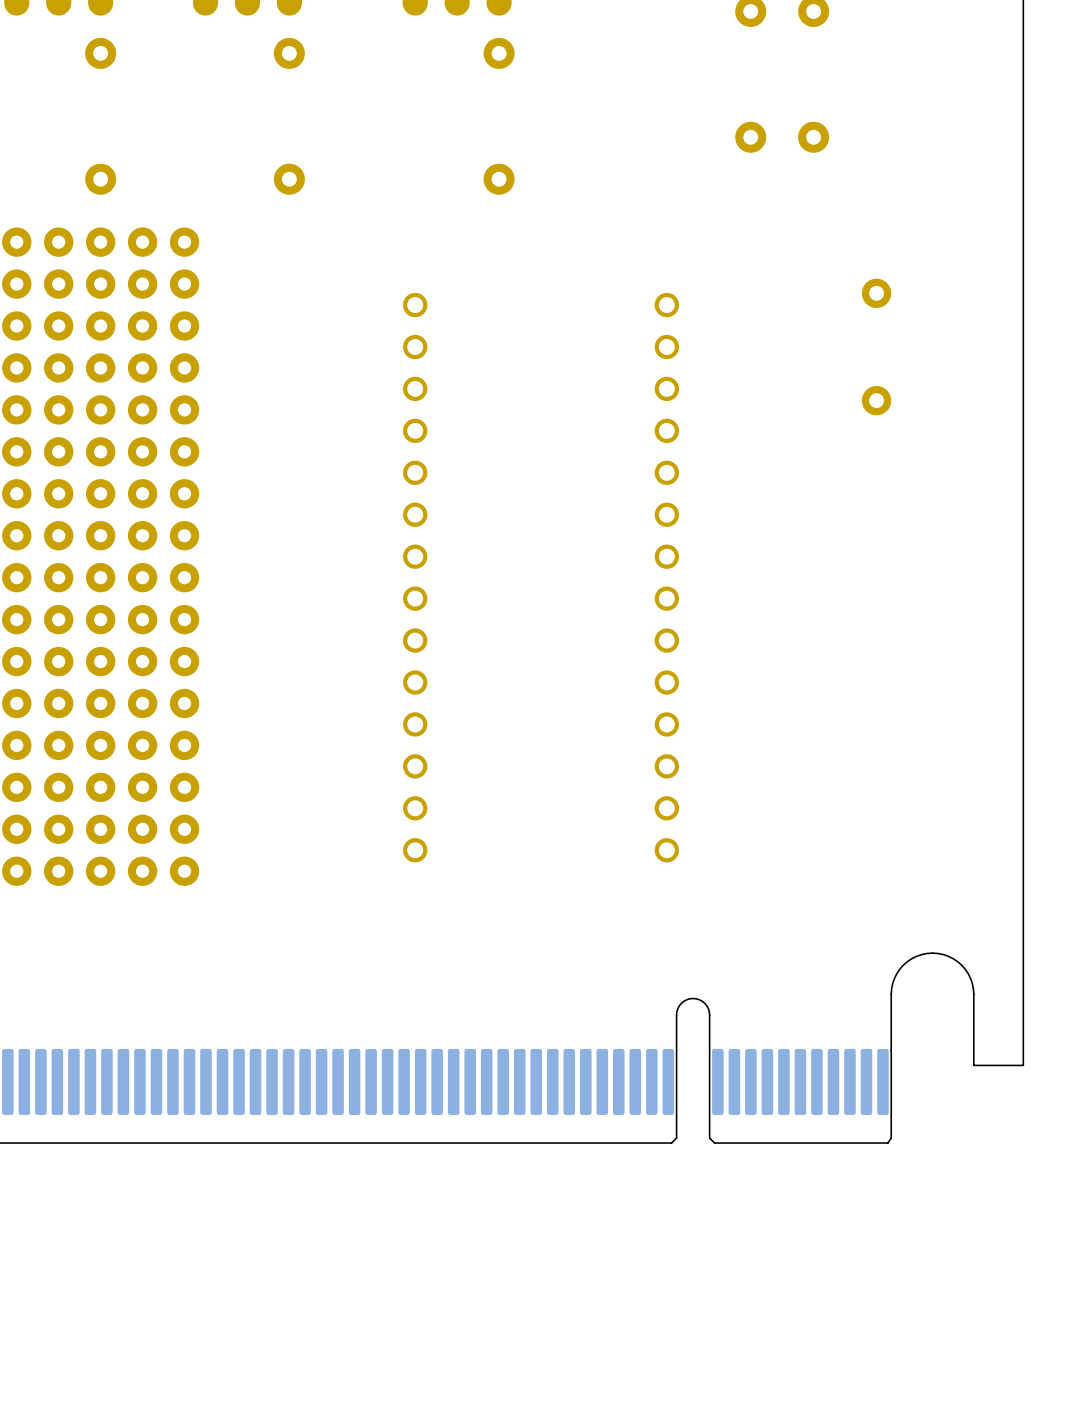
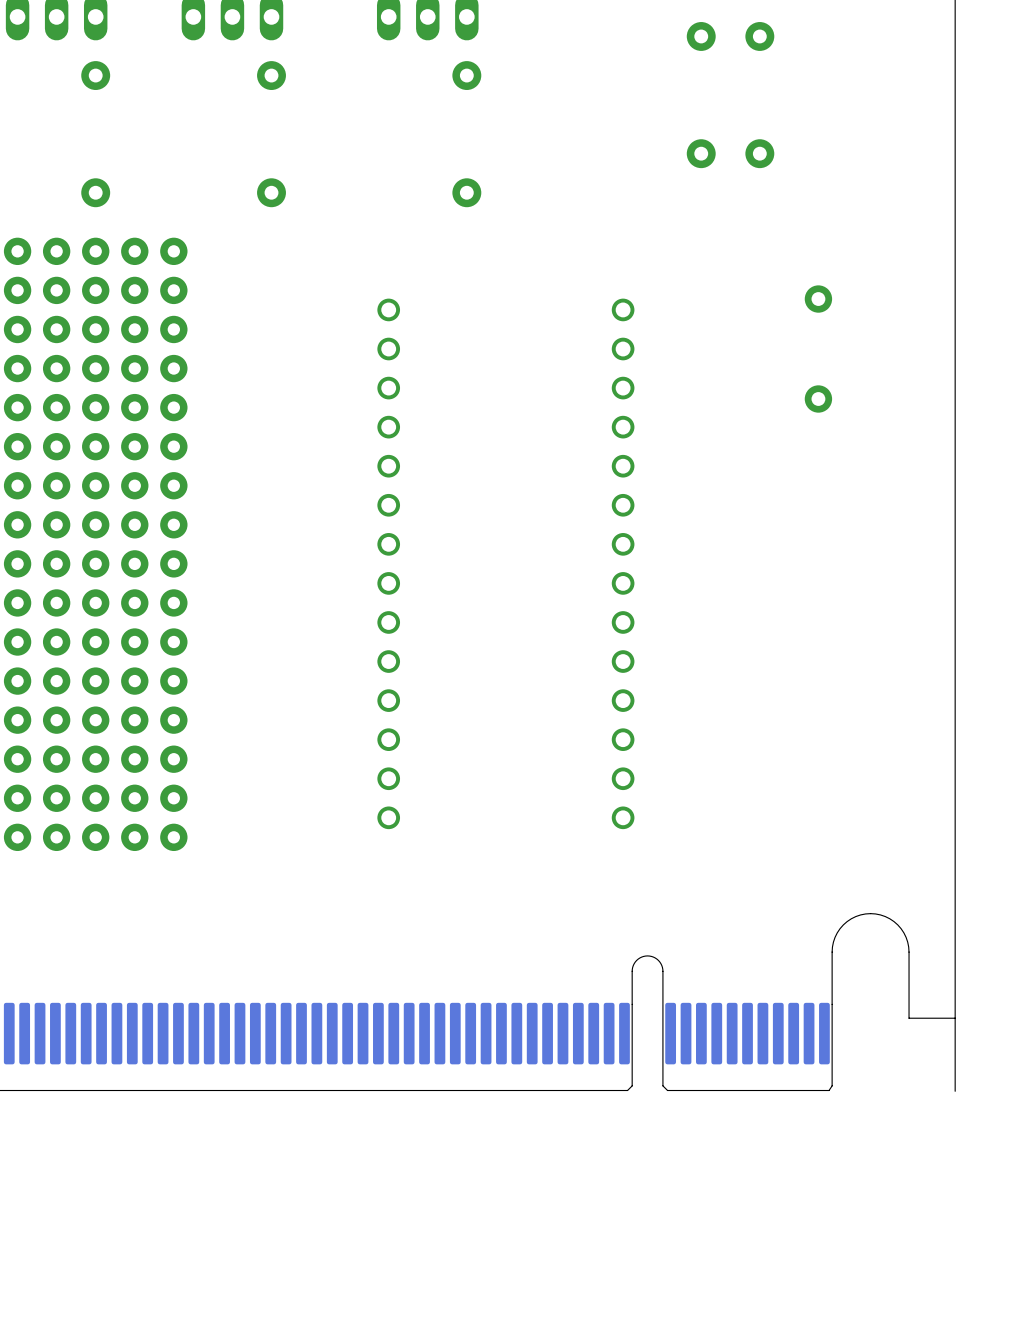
board edge: none -> (955, 1018) (955, 1091)

